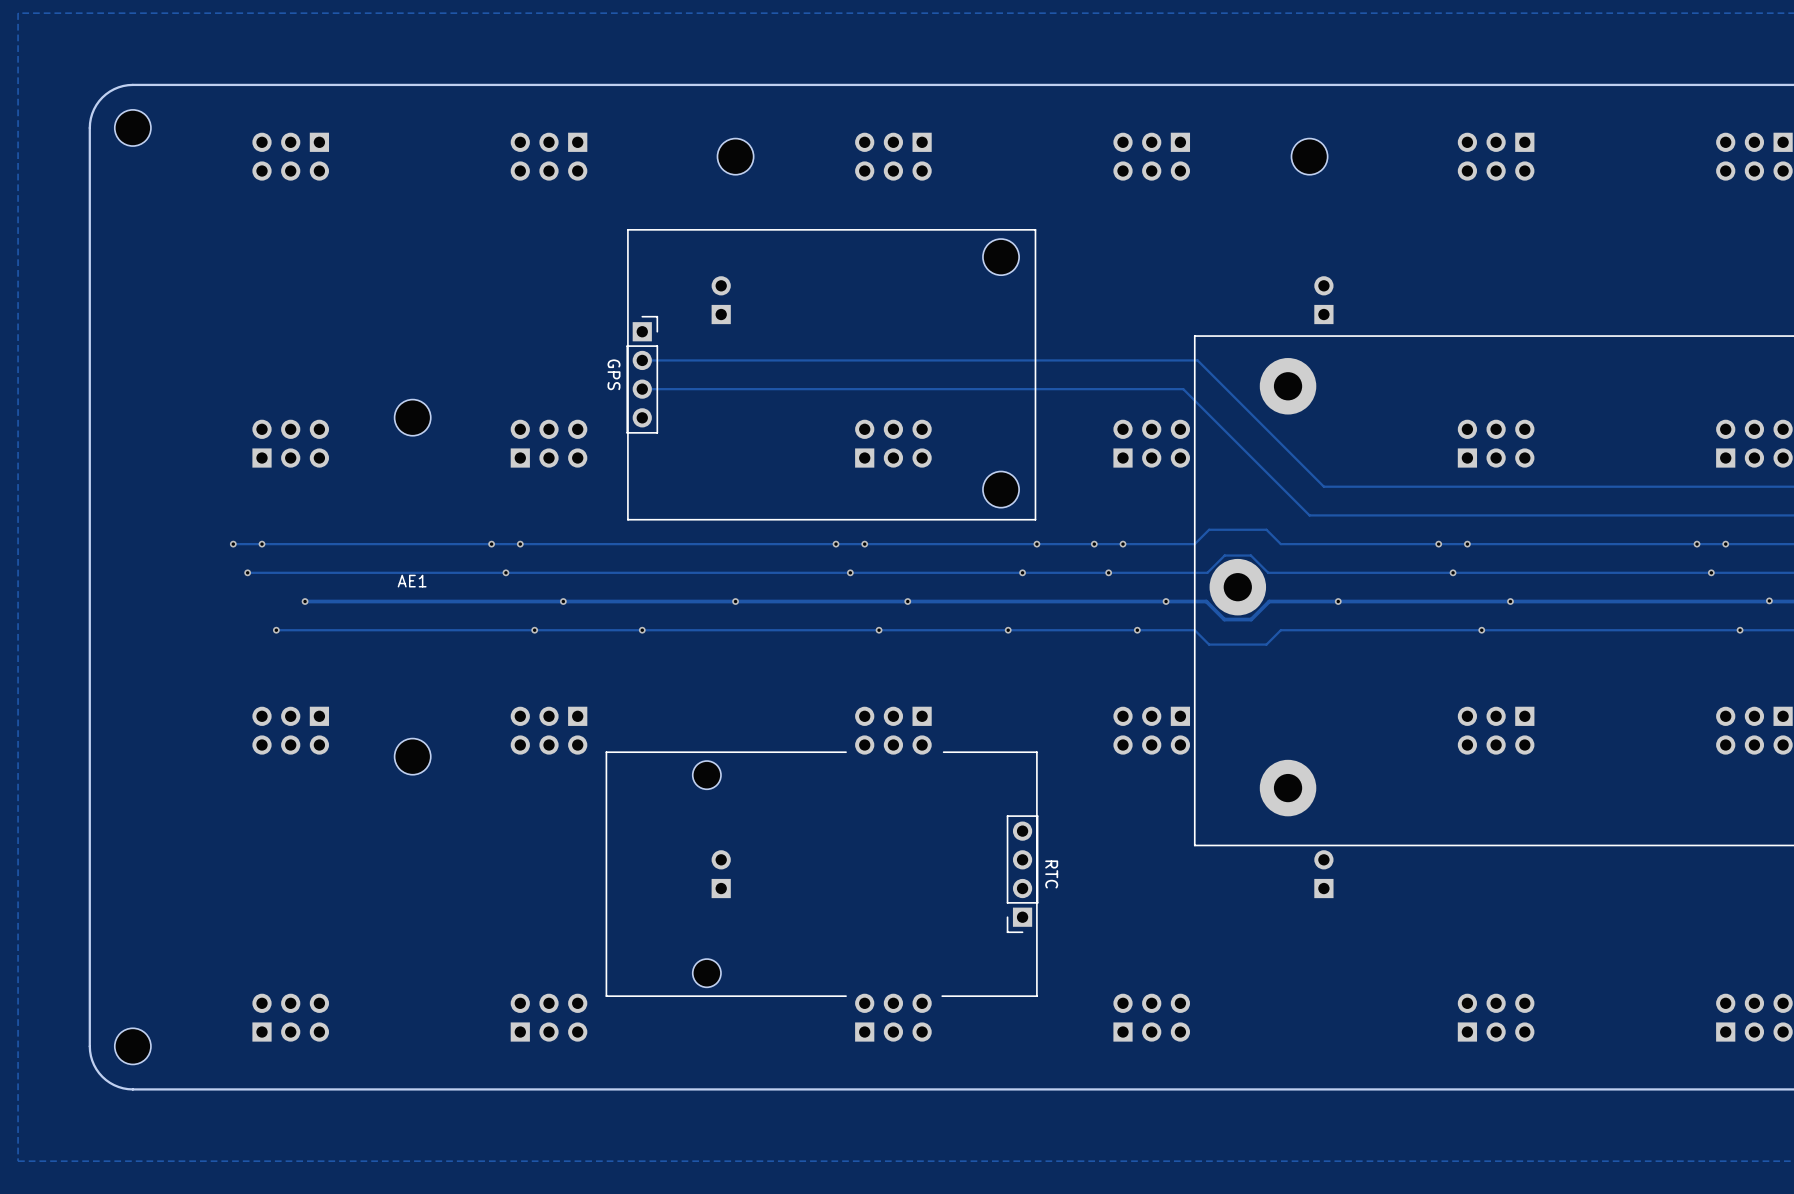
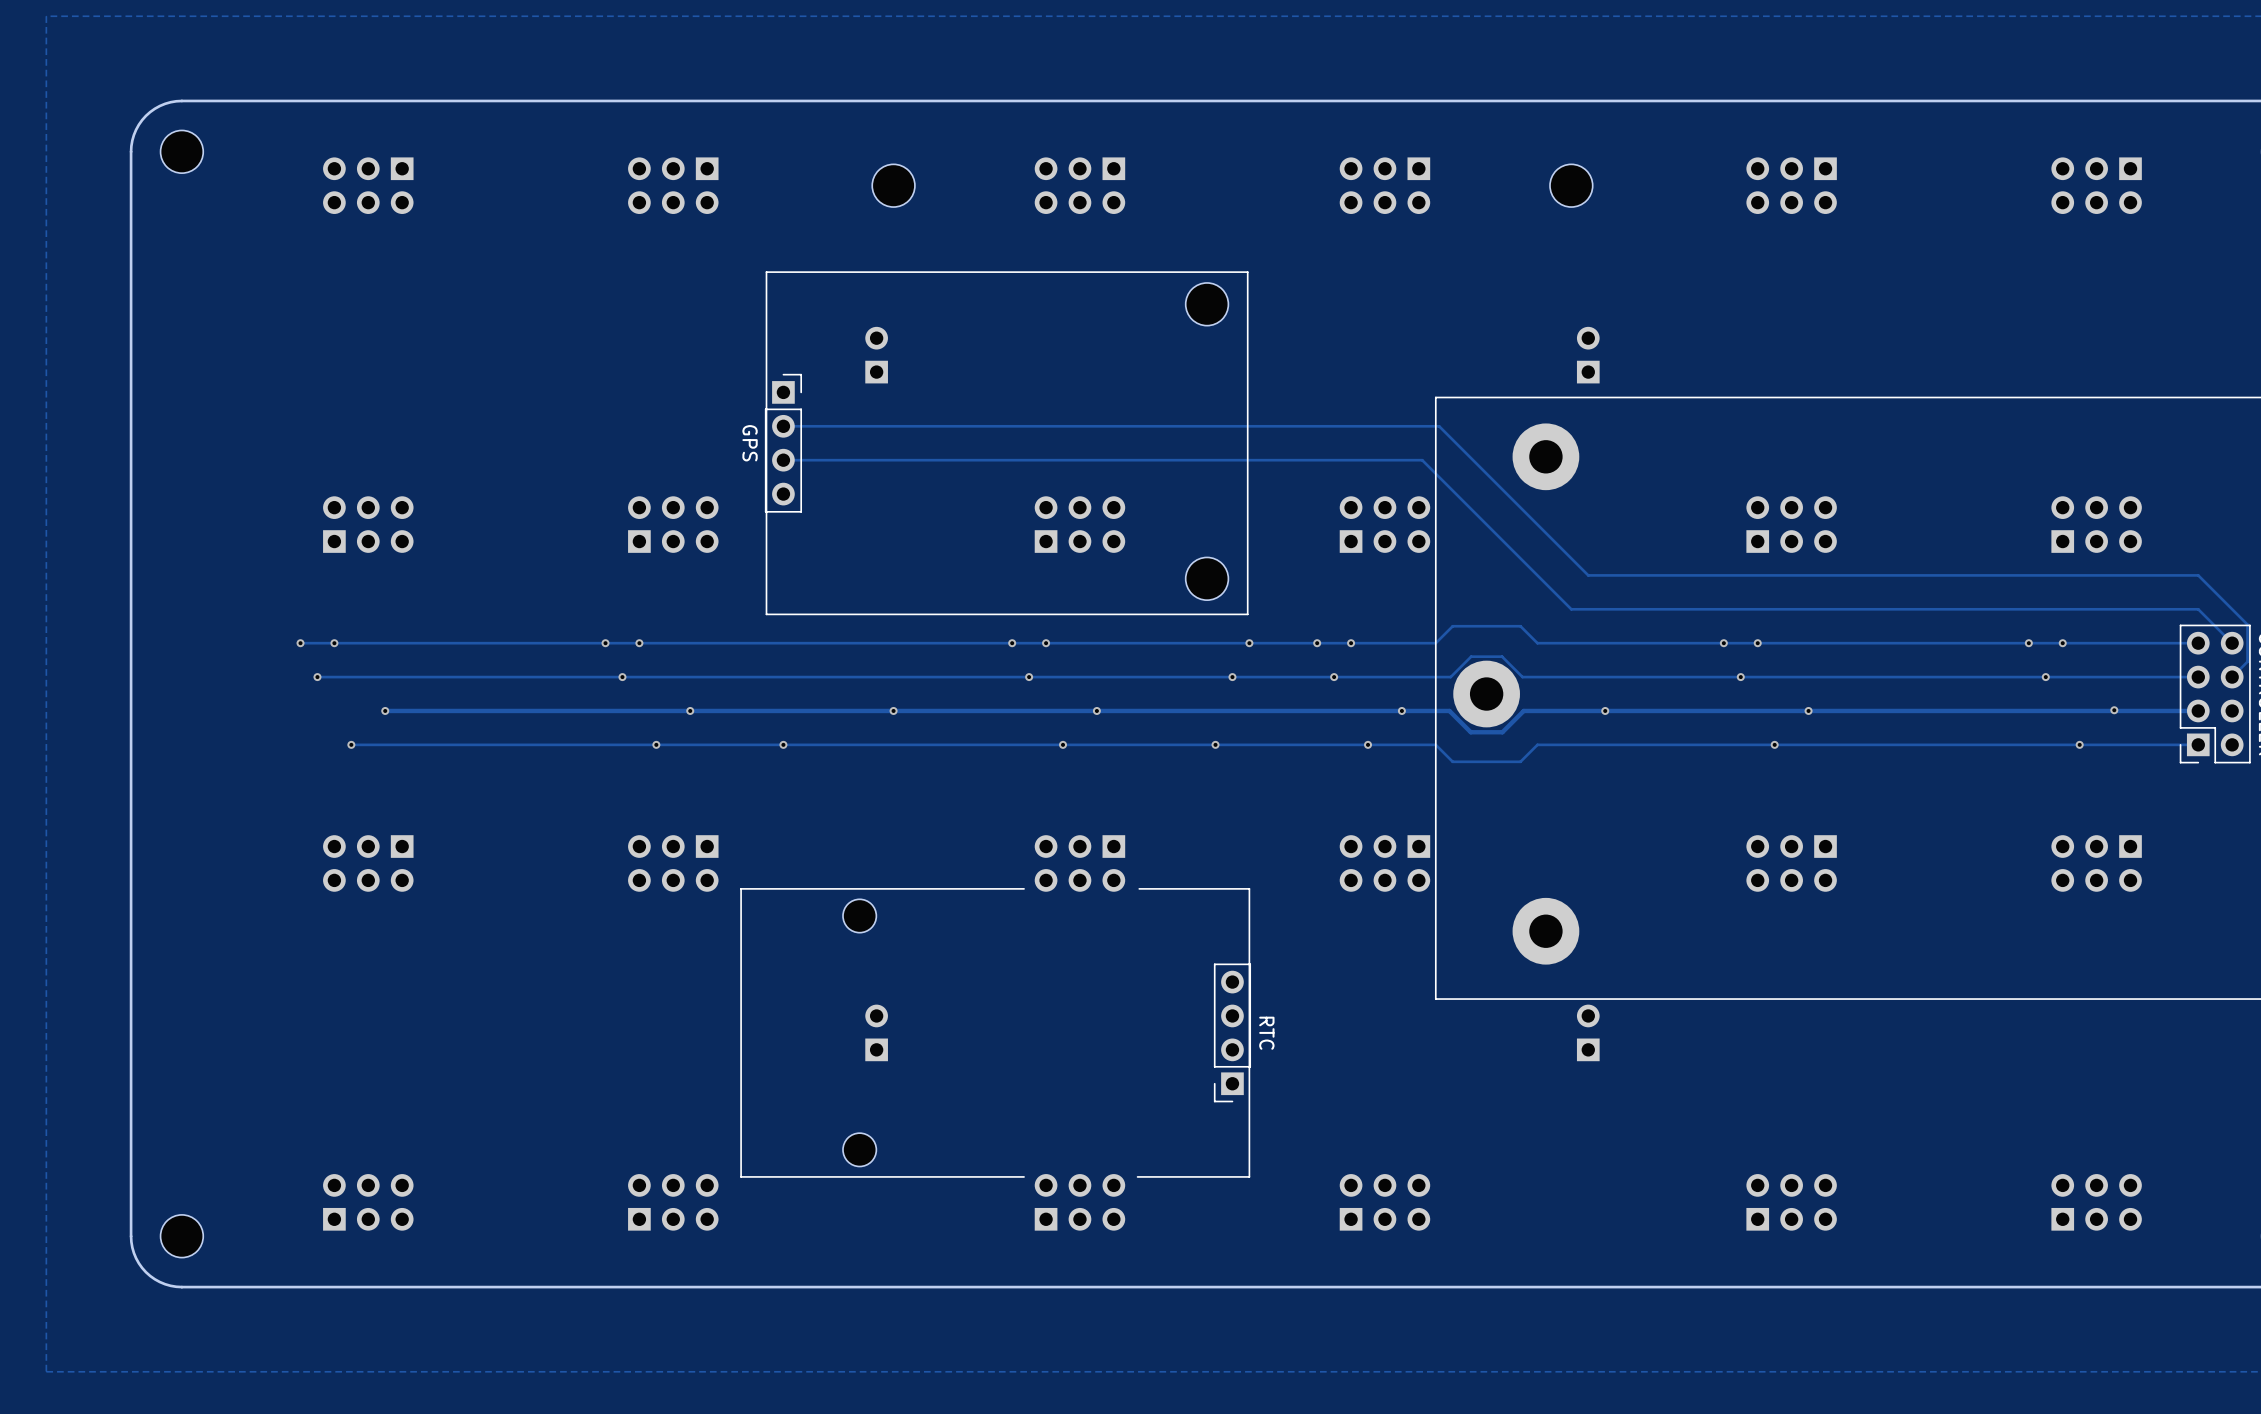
AE1: (412, 587) -> none

